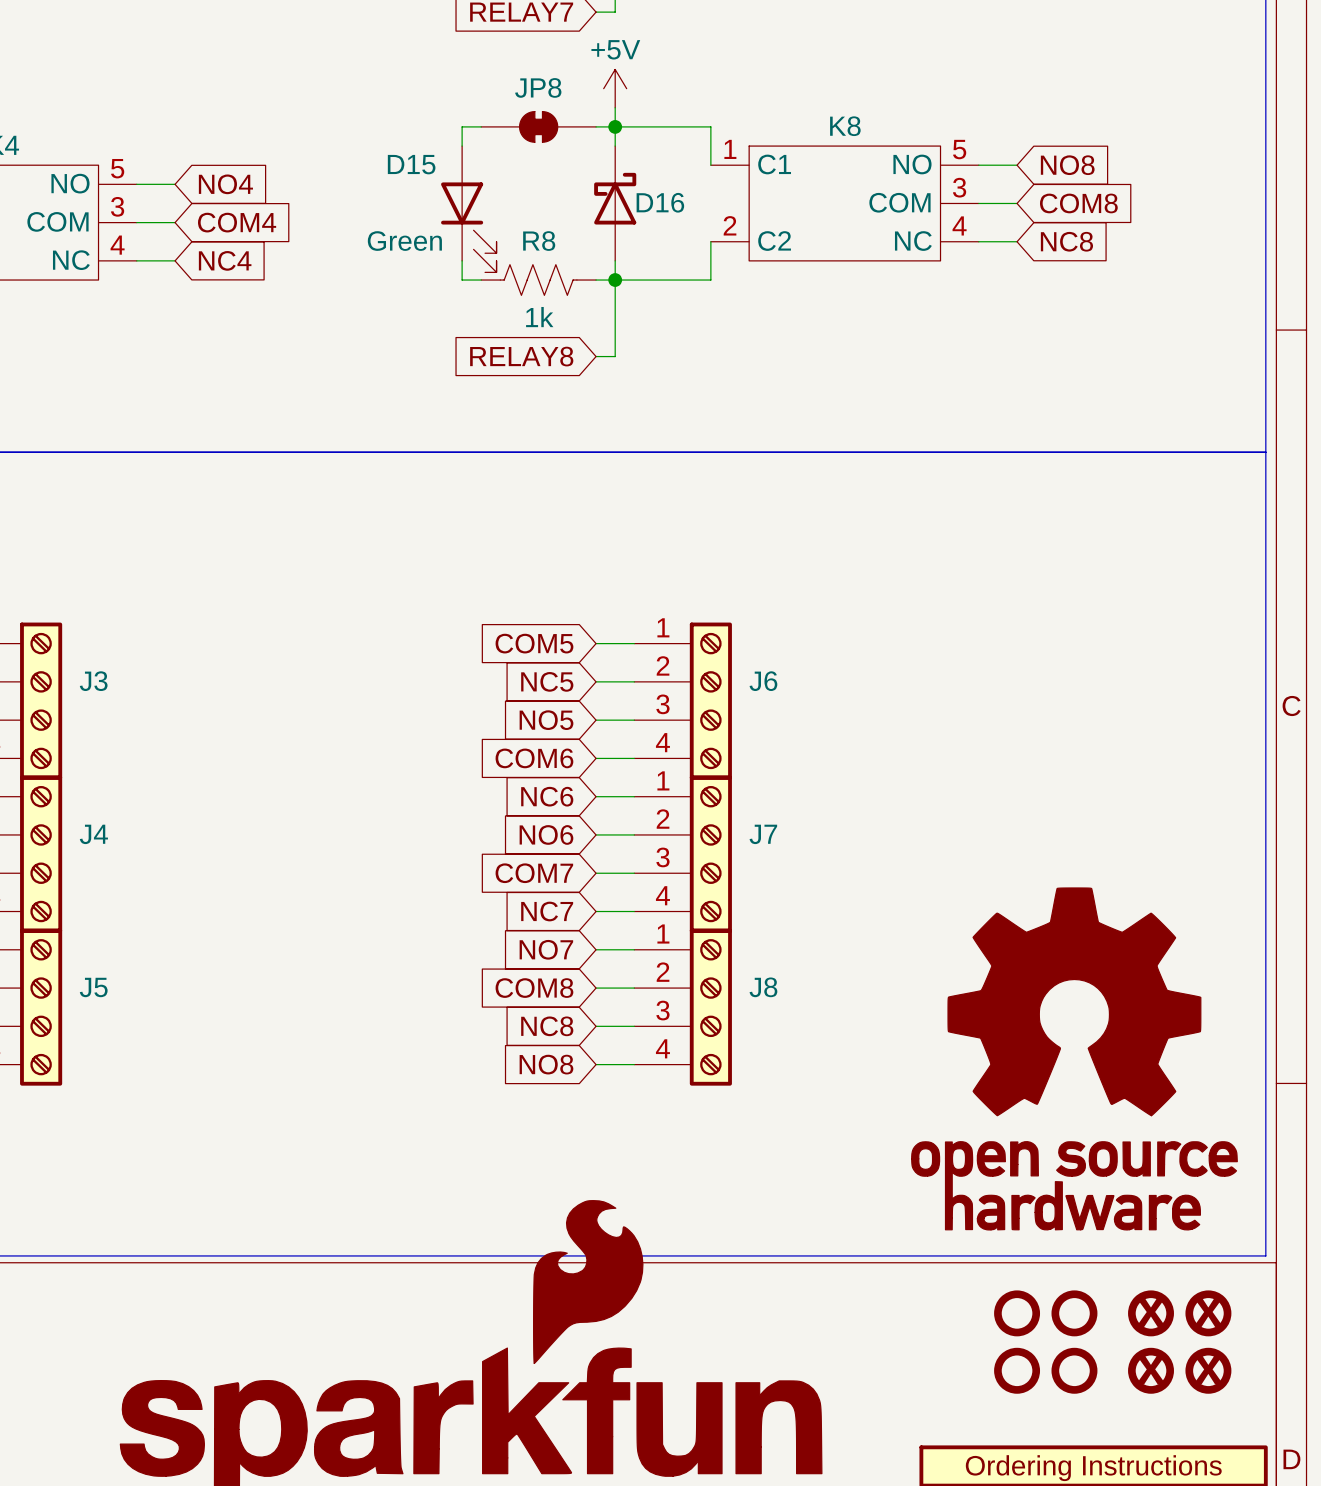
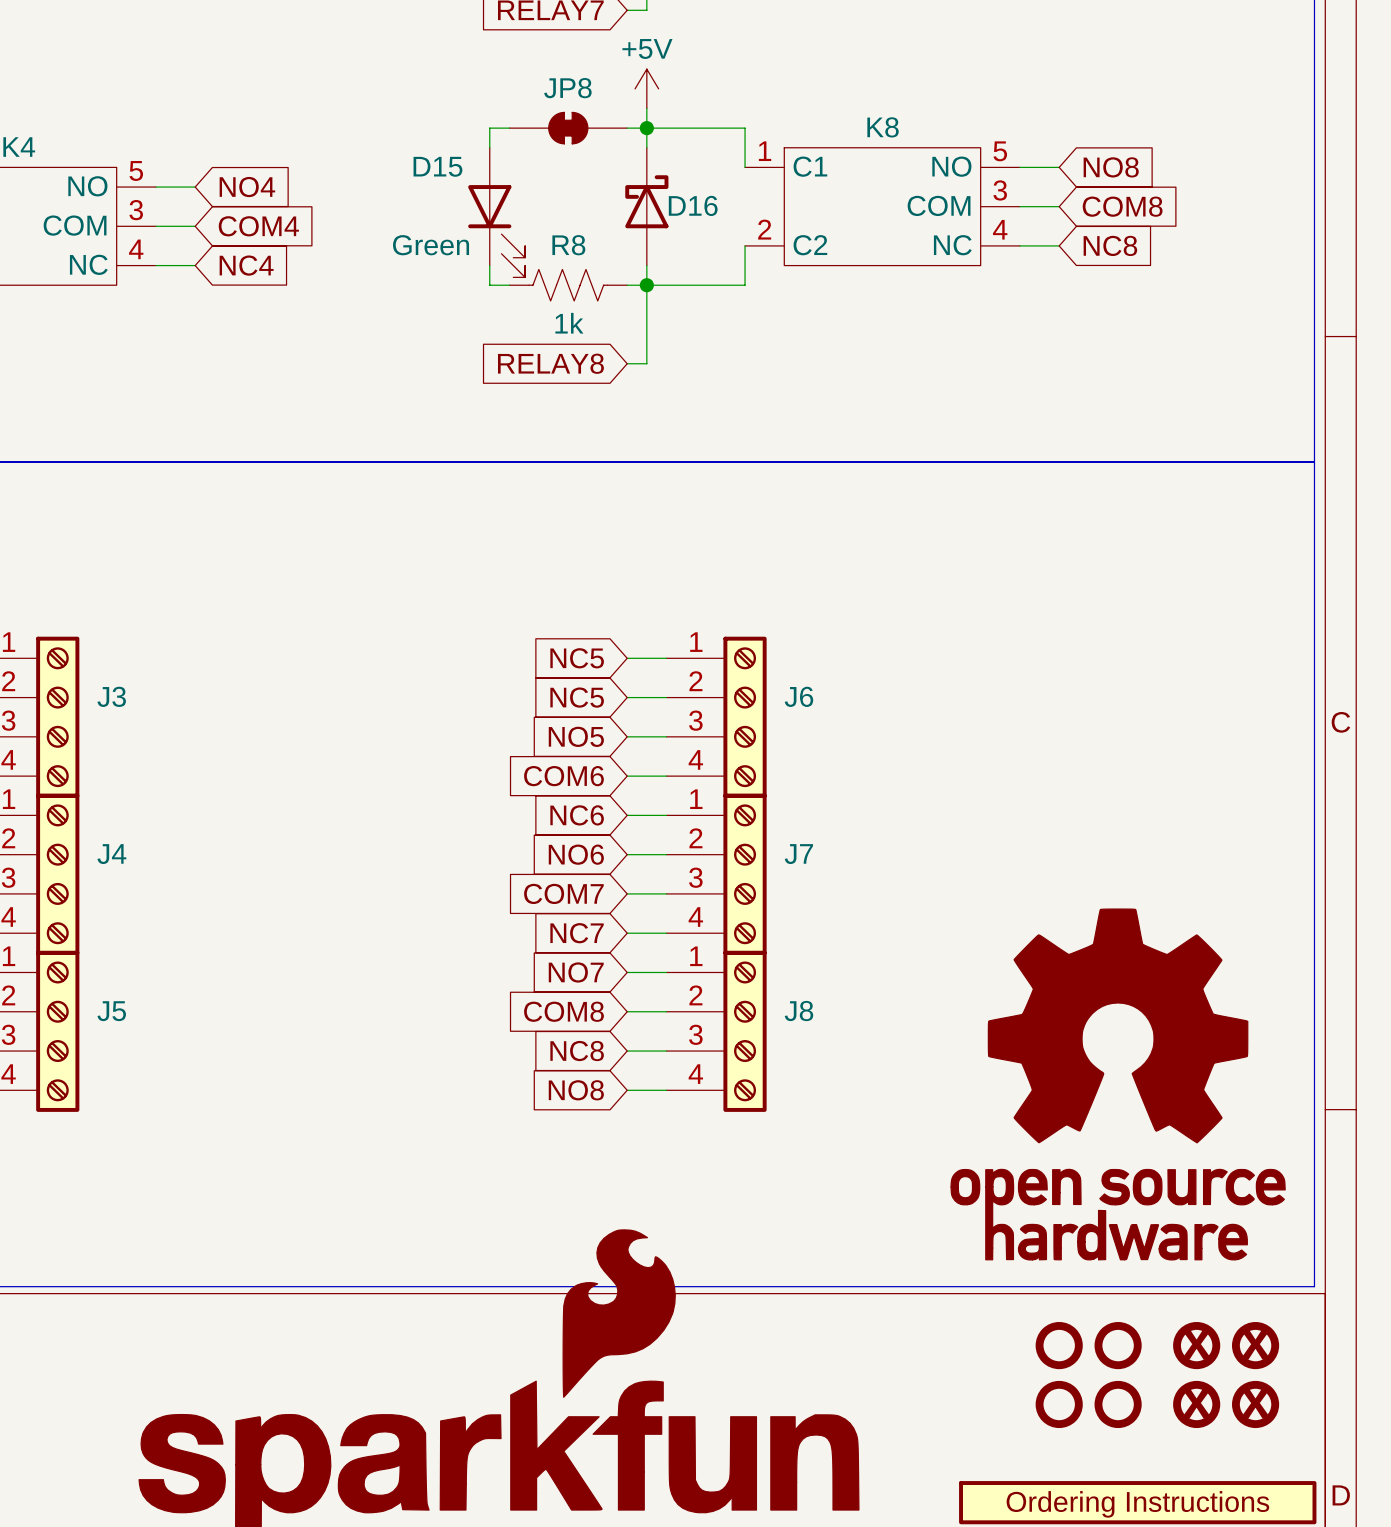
global label: COM5 (534, 643) -> NC5 (577, 658)

